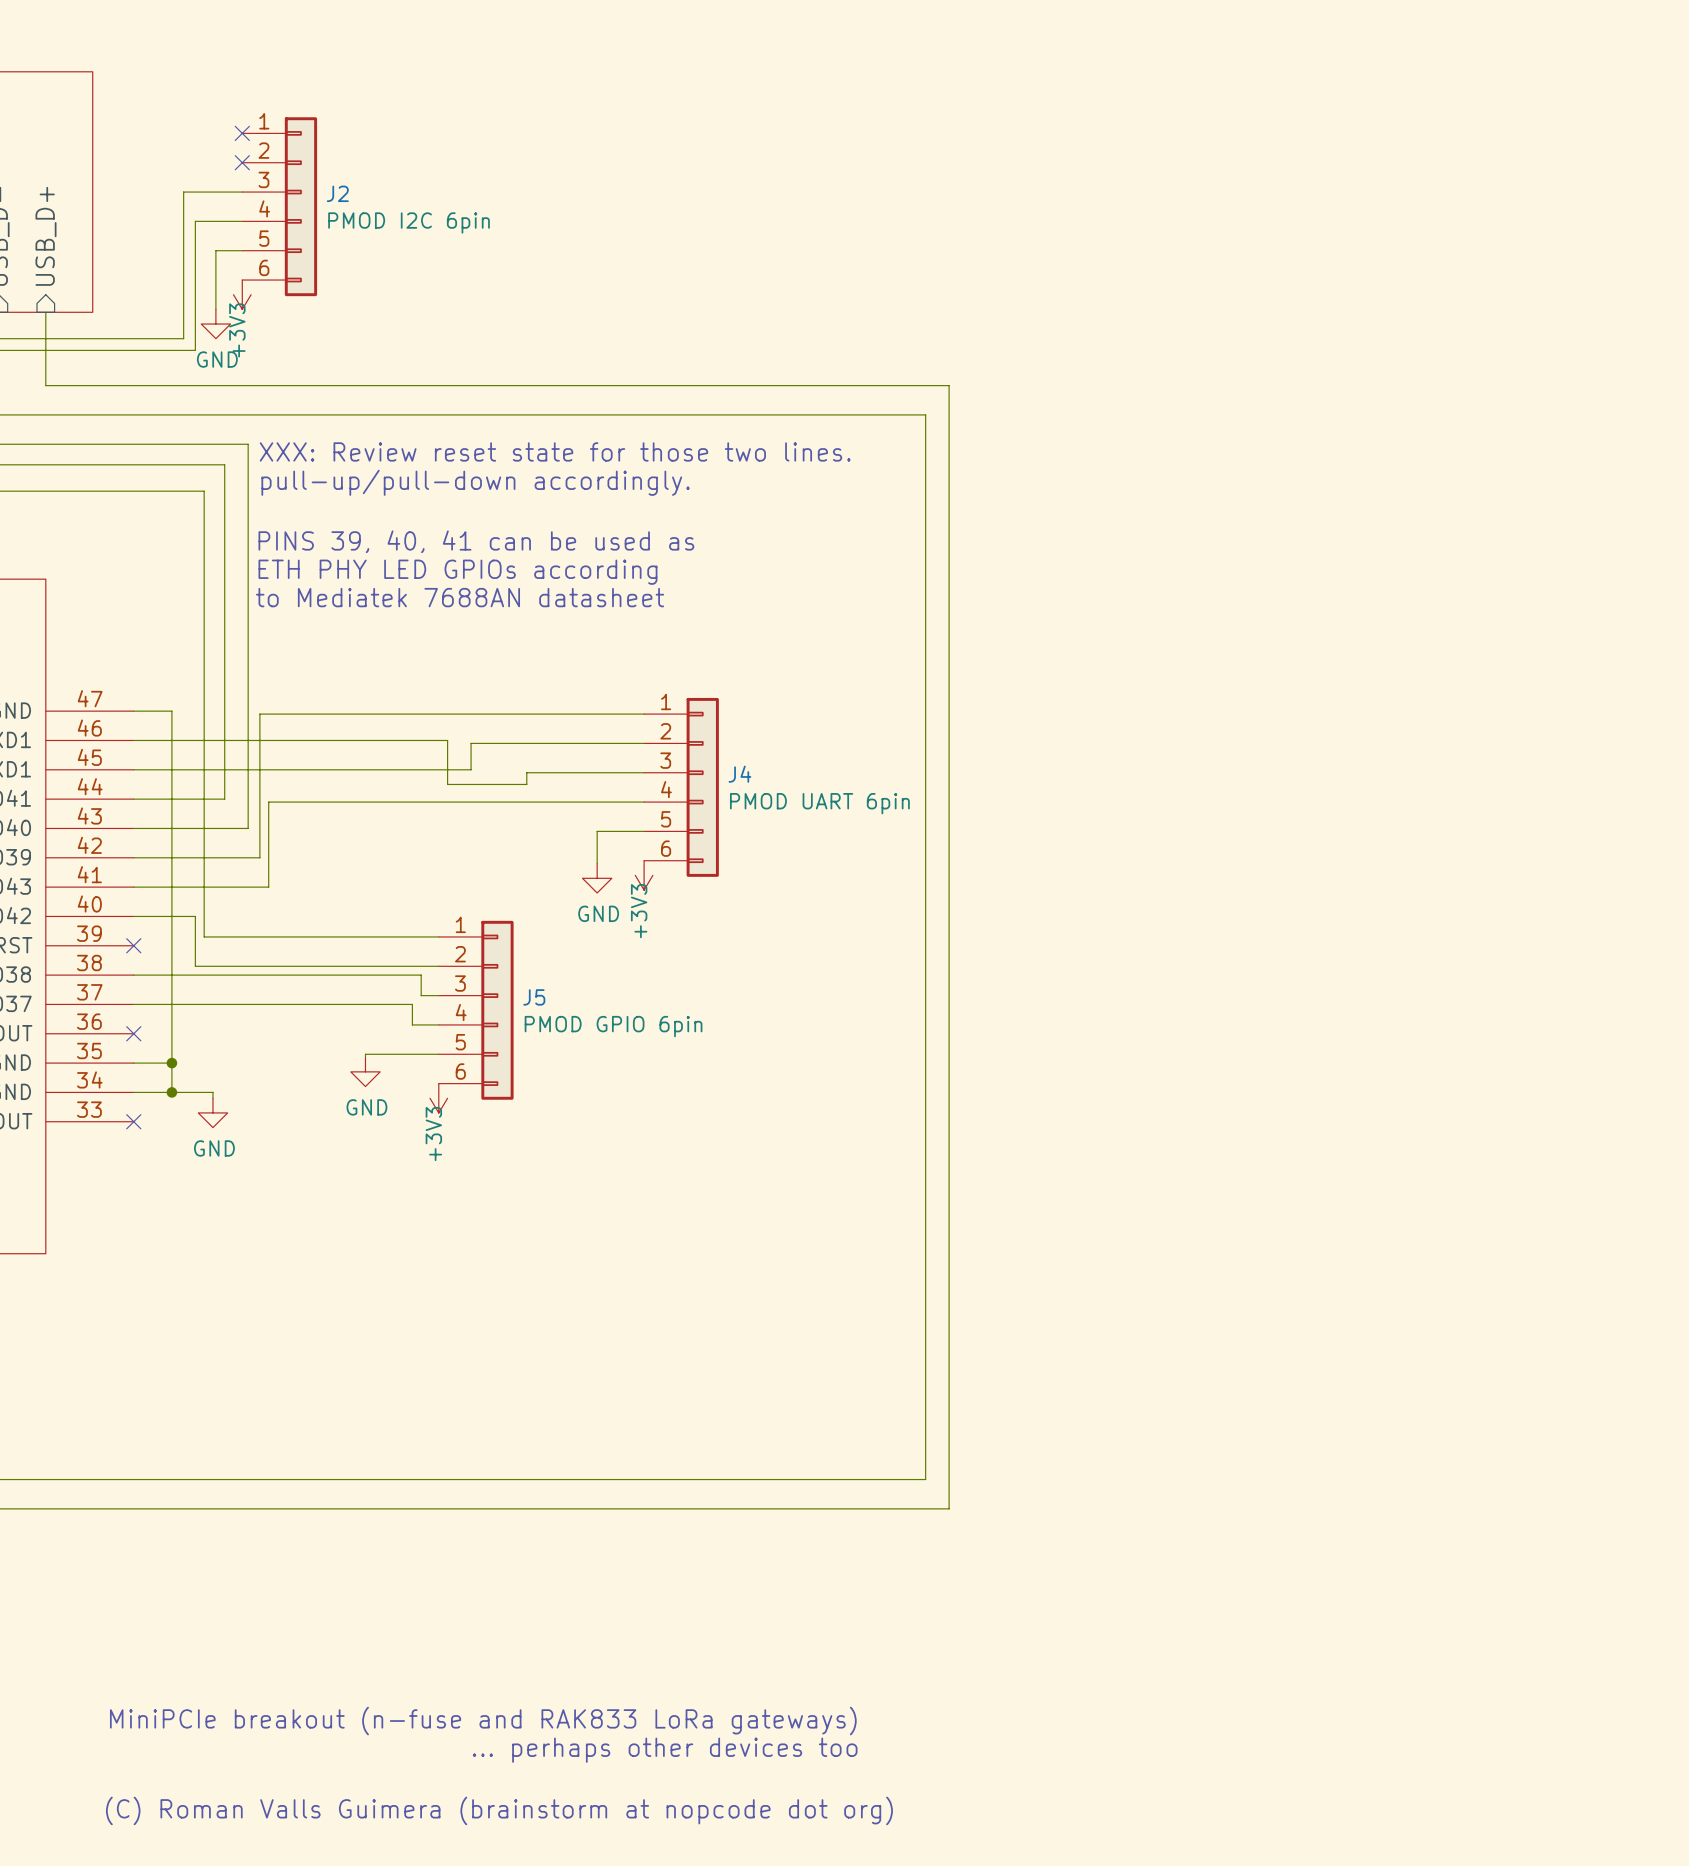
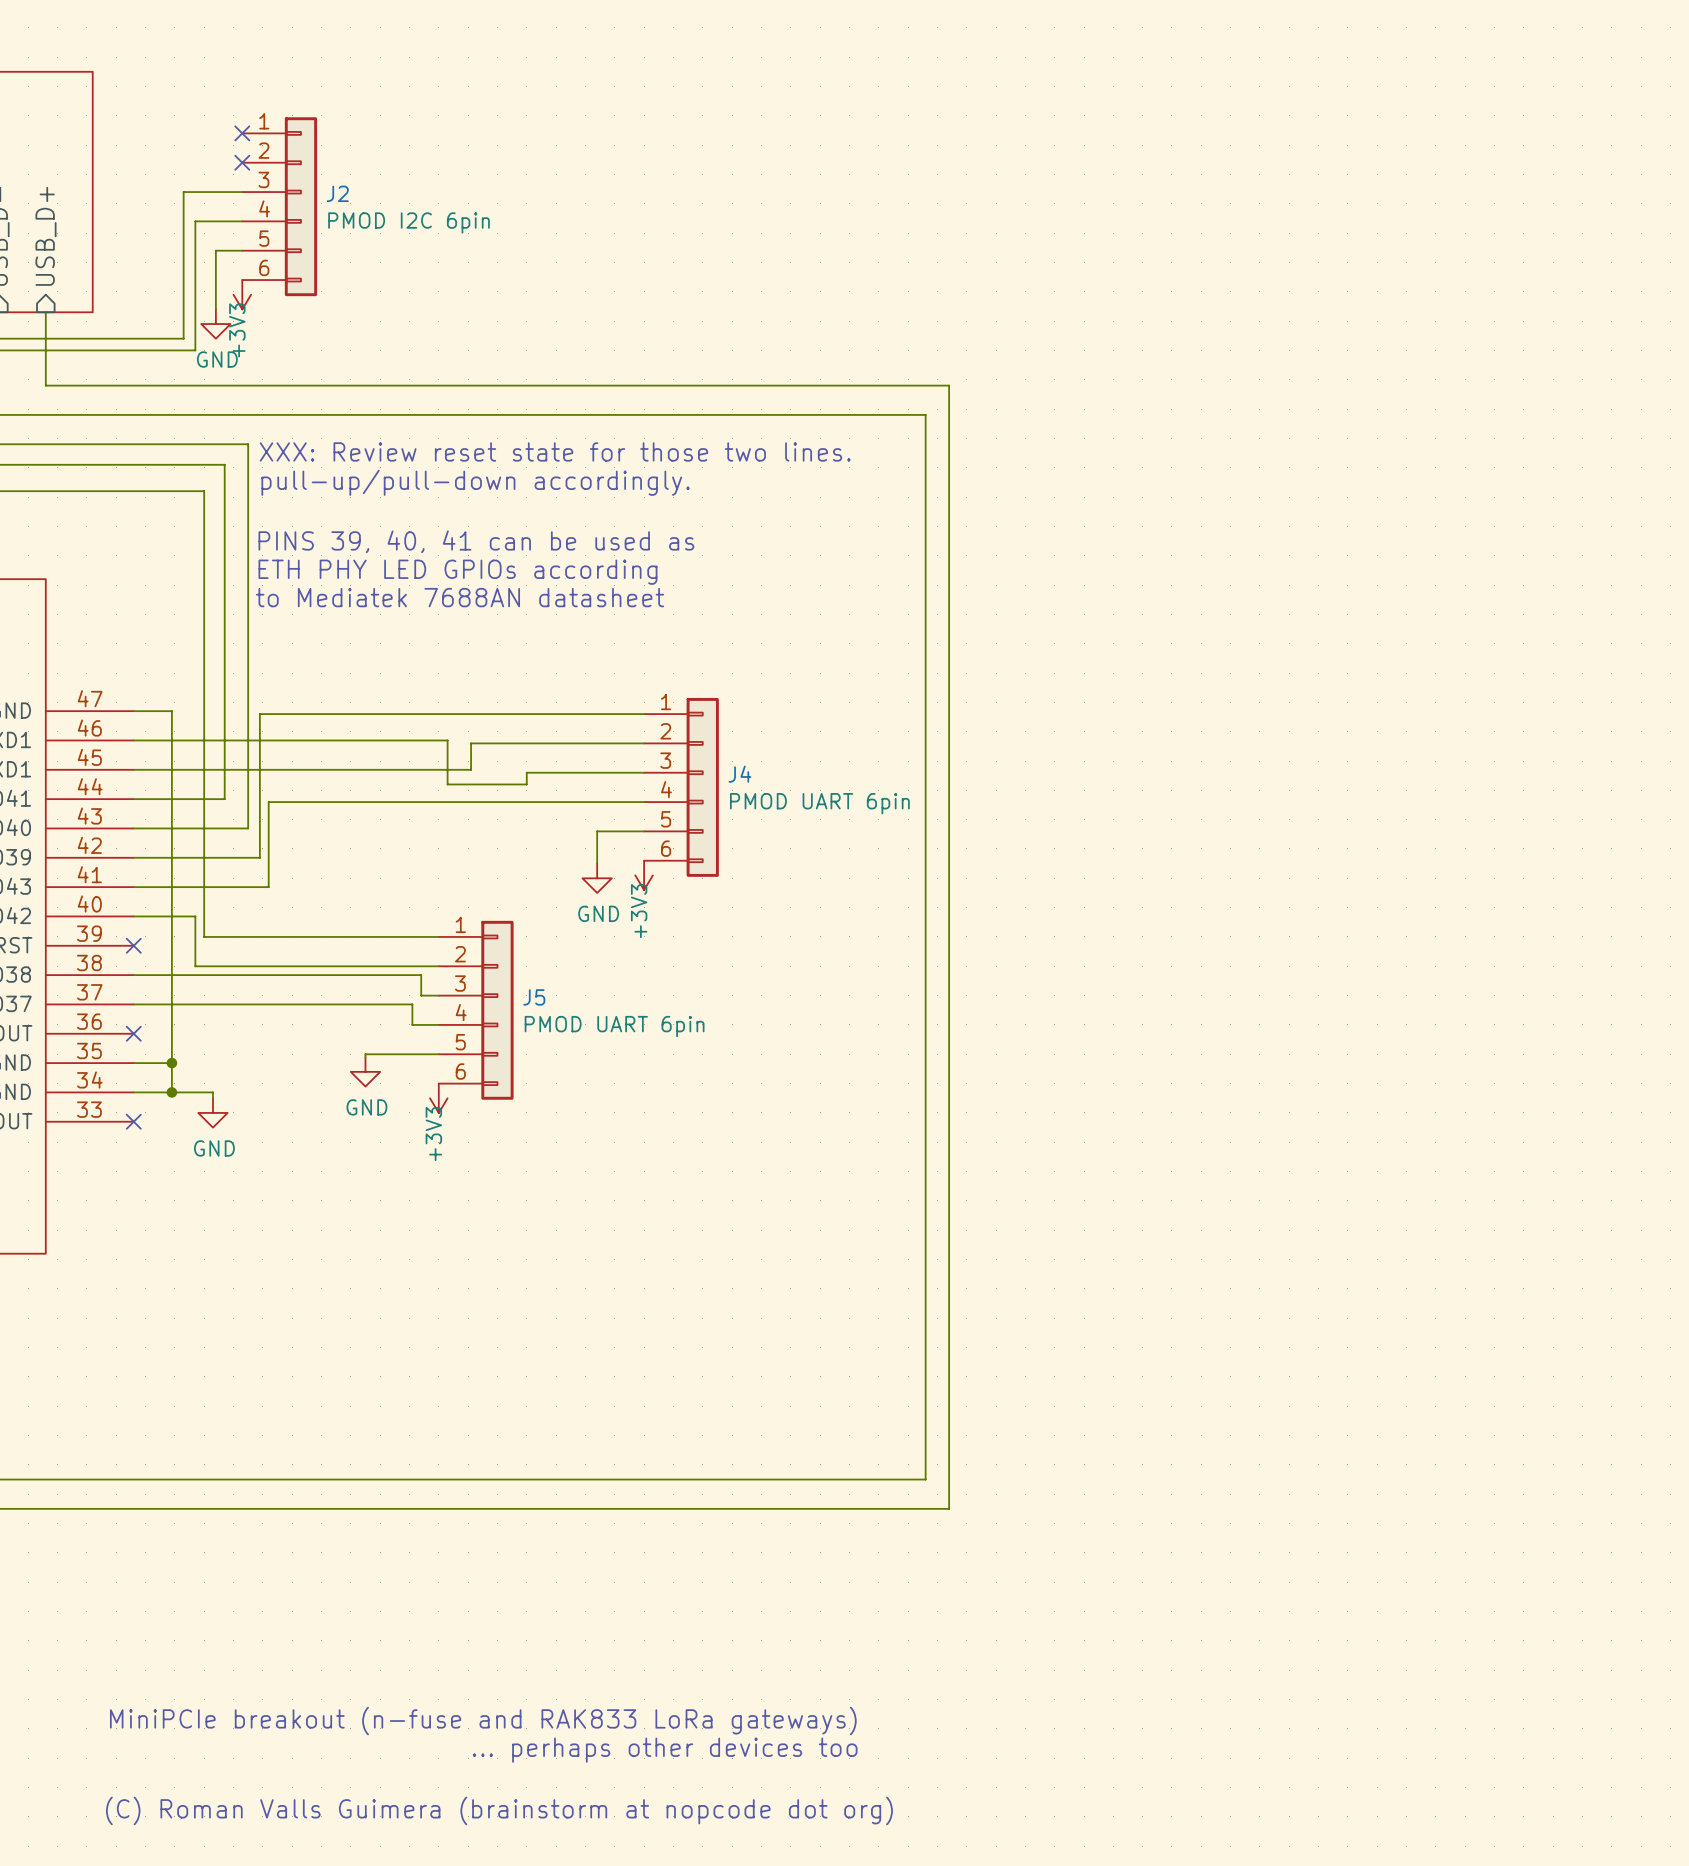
J5 value: PMOD GPIO 6pin (613, 1026) -> PMOD UART 6pin (614, 1026)

